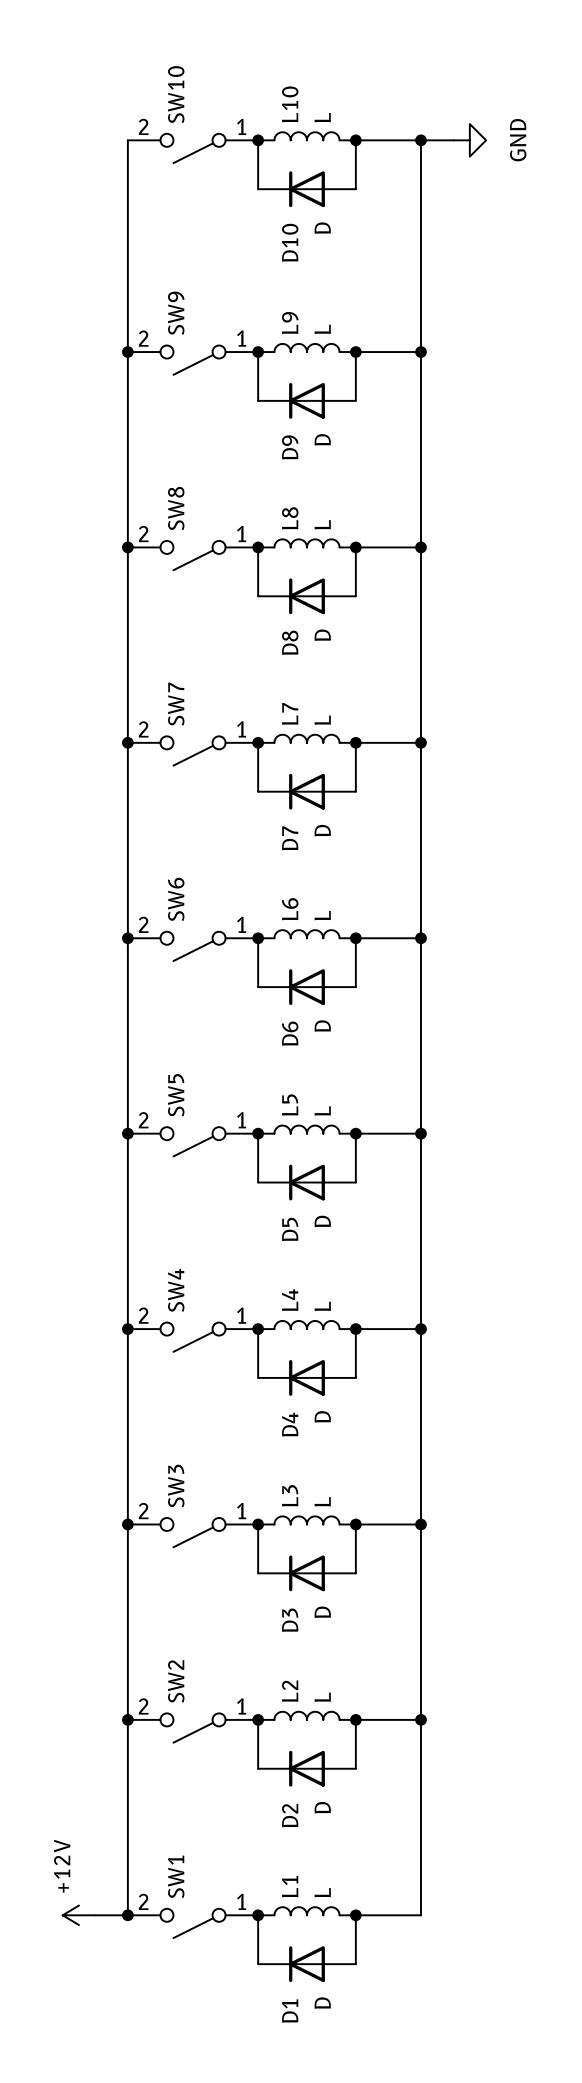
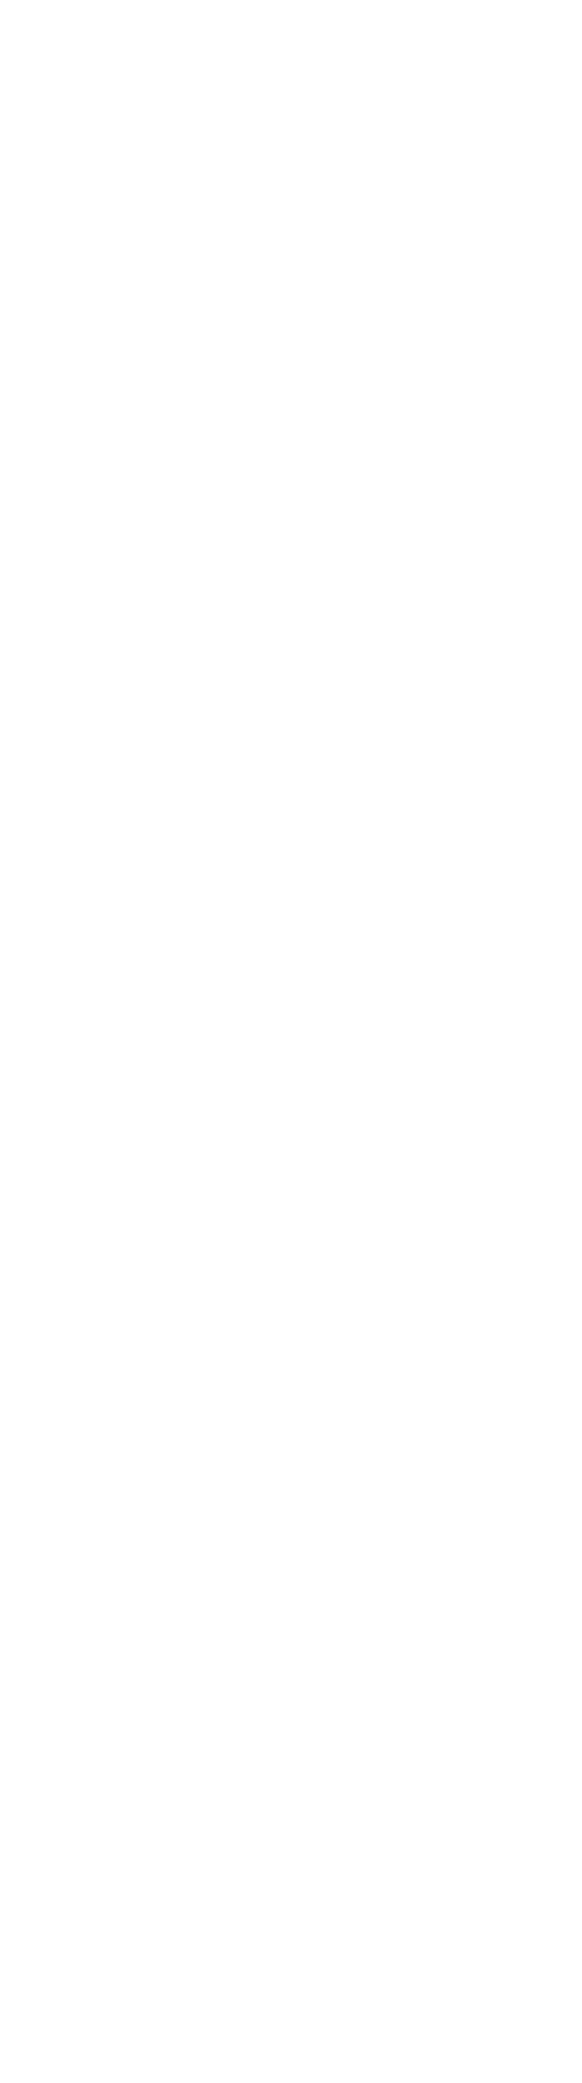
L10: L (307, 136) -> none
wire: (127, 140) (127, 1915) (95, 1915) -> none
wire: (258, 140) (258, 189) -> none
junction: (258, 140) -> none
junction: (355, 140) -> none
wire: (420, 140) (420, 1915) (355, 1915) (355, 1964) -> none
junction: (420, 140) -> none
wire: (453, 140) (355, 140) (355, 189) -> none
power symbol: GND (469, 140) -> none
SW10: (193, 148) -> none
D10: D (307, 189) -> none
L9: L (307, 347) -> none
junction: (127, 352) -> none
wire: (258, 352) (258, 400) -> none
junction: (258, 352) -> none
junction: (355, 352) -> none
wire: (420, 352) (355, 352) (355, 400) -> none
junction: (420, 352) -> none
SW9: (193, 360) -> none
D9: D (307, 400) -> none
L8: L (307, 543) -> none
junction: (127, 547) -> none
wire: (258, 547) (258, 596) -> none
junction: (258, 547) -> none
junction: (355, 547) -> none
wire: (420, 547) (355, 547) (355, 596) -> none
junction: (420, 547) -> none
SW8: (193, 555) -> none
D8: D (307, 596) -> none
L7: L (307, 738) -> none
junction: (127, 742) -> none
wire: (258, 742) (258, 791) -> none
junction: (258, 742) -> none
junction: (355, 742) -> none
wire: (420, 742) (355, 742) (355, 791) -> none
junction: (420, 742) -> none
SW7: (193, 750) -> none
D7: D (307, 791) -> none
L6: L (307, 934) -> none
junction: (127, 938) -> none
wire: (258, 938) (258, 987) -> none
junction: (258, 938) -> none
junction: (355, 938) -> none
wire: (420, 938) (355, 938) (355, 987) -> none
junction: (420, 938) -> none
SW6: (193, 946) -> none
D6: D (307, 987) -> none
L5: L (307, 1129) -> none
junction: (127, 1133) -> none
wire: (258, 1133) (258, 1182) -> none
junction: (258, 1133) -> none
junction: (355, 1133) -> none
wire: (420, 1133) (355, 1133) (355, 1182) -> none
junction: (420, 1133) -> none
SW5: (193, 1141) -> none
D5: D (307, 1182) -> none
L4: L (307, 1325) -> none
junction: (127, 1329) -> none
wire: (258, 1329) (258, 1377) -> none
junction: (258, 1329) -> none
junction: (355, 1329) -> none
wire: (420, 1329) (355, 1329) (355, 1377) -> none
junction: (420, 1329) -> none
SW4: (193, 1337) -> none
D4: D (307, 1377) -> none
L3: L (307, 1520) -> none
junction: (127, 1524) -> none
wire: (258, 1524) (258, 1573) -> none
junction: (258, 1524) -> none
junction: (355, 1524) -> none
wire: (420, 1524) (355, 1524) (355, 1573) -> none
junction: (420, 1524) -> none
SW3: (193, 1532) -> none
D3: D (307, 1573) -> none
L2: L (307, 1715) -> none
junction: (127, 1719) -> none
wire: (258, 1719) (258, 1768) -> none
junction: (258, 1719) -> none
junction: (355, 1719) -> none
wire: (420, 1719) (355, 1719) (355, 1768) -> none
junction: (420, 1719) -> none
SW2: (193, 1728) -> none
D2: D (307, 1768) -> none
L1: L (307, 1911) -> none
power symbol: +12V (79, 1915) -> none
junction: (127, 1915) -> none
wire: (258, 1915) (258, 1964) -> none
junction: (258, 1915) -> none
junction: (355, 1915) -> none
SW1: (193, 1923) -> none
D1: D (307, 1964) -> none

